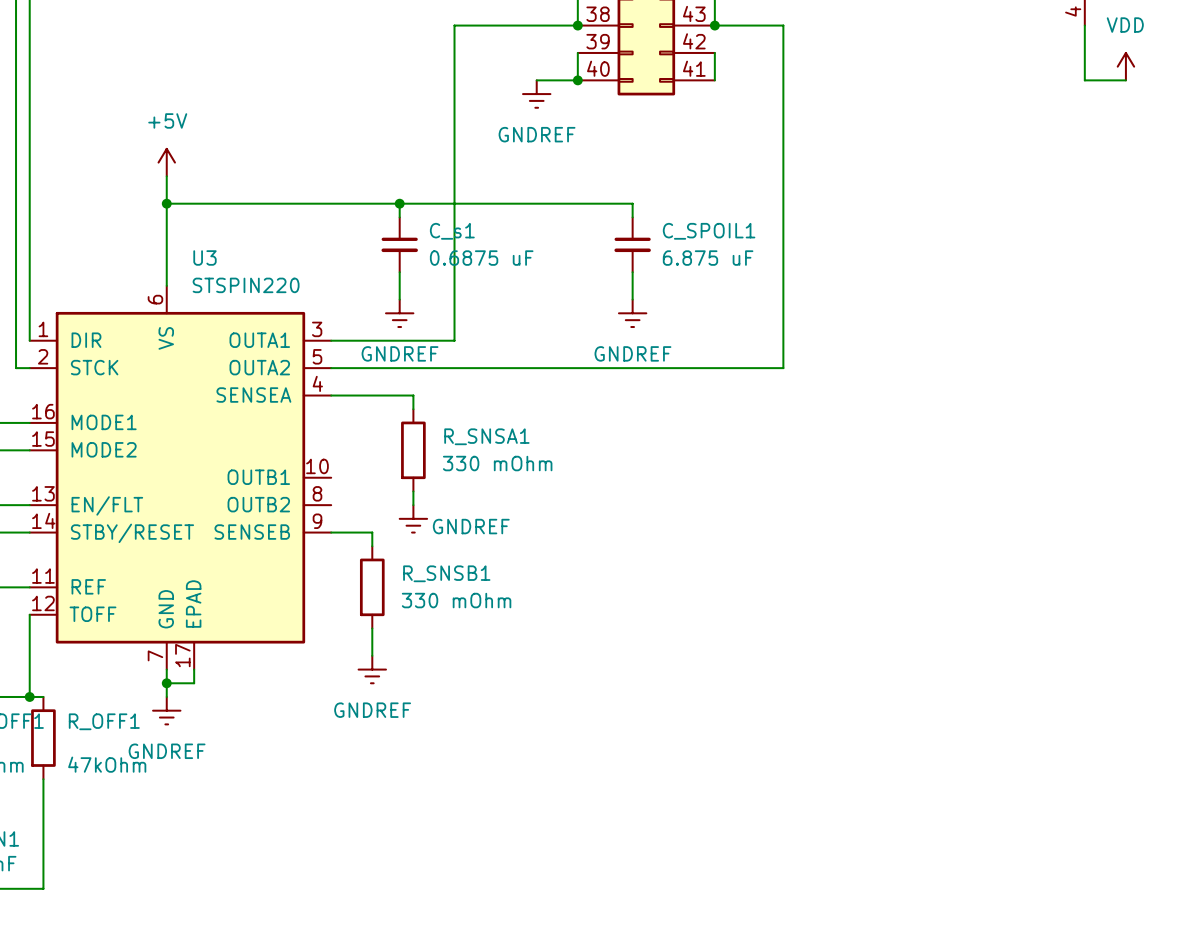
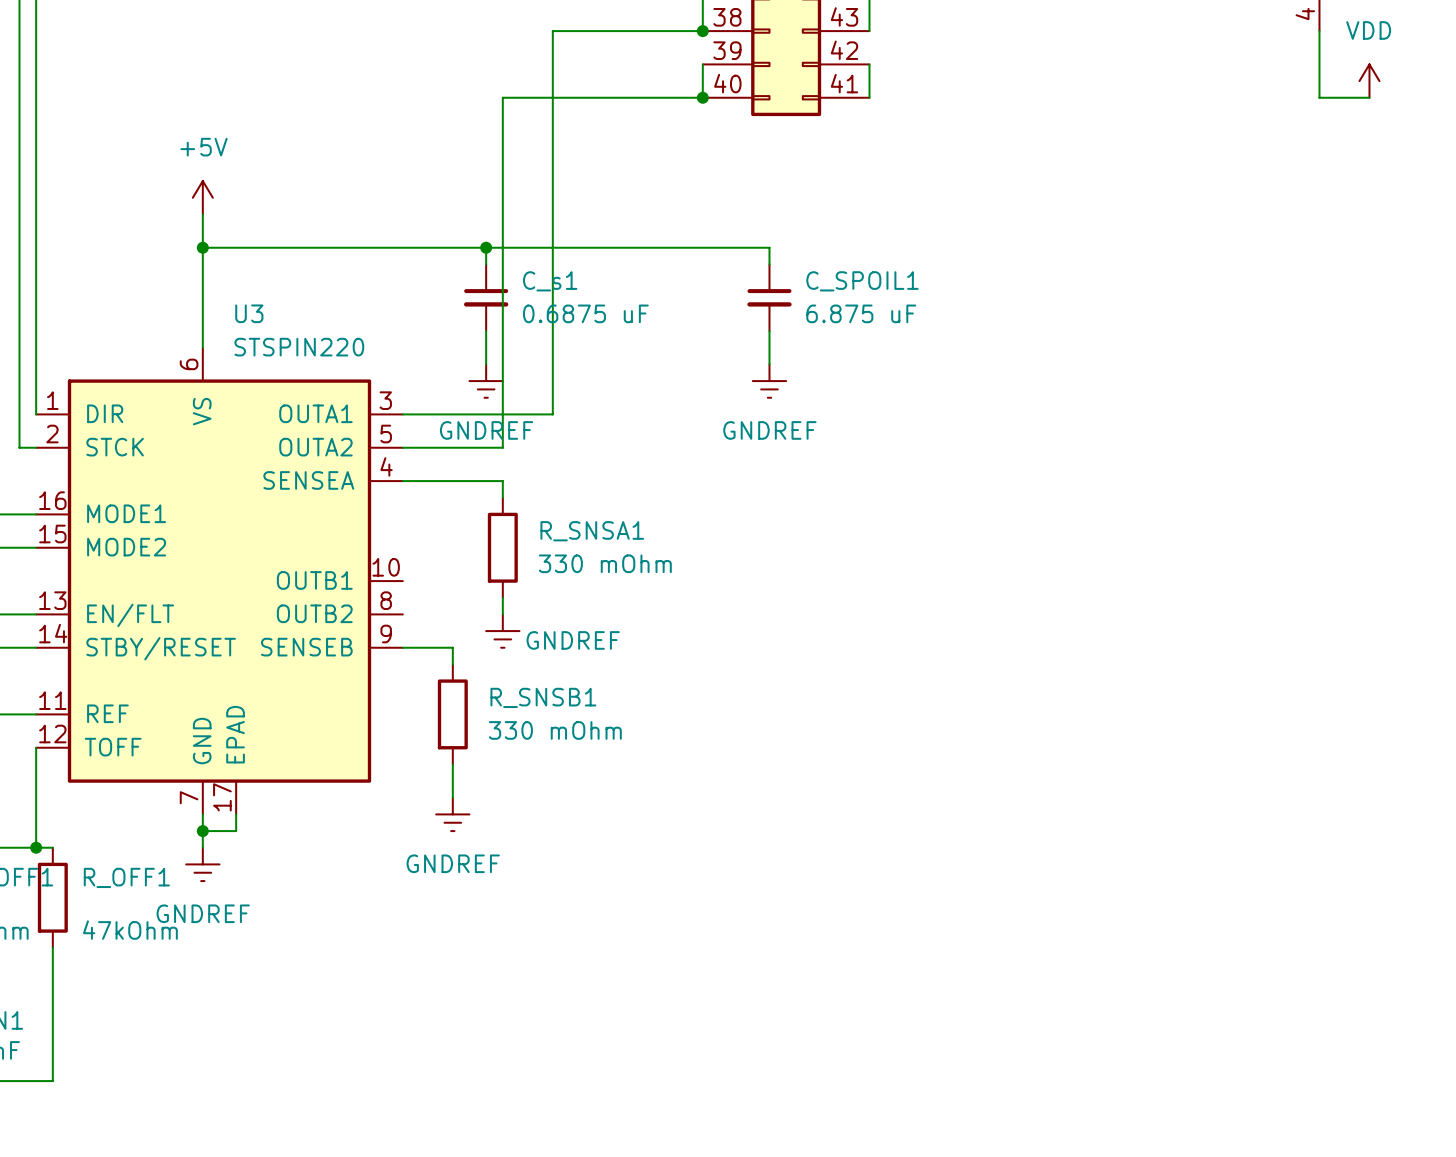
wire: (714, 25) (783, 25) (783, 368) (413, 368) -> (652, 97) (502, 97) (502, 447)
junction: (714, 25) -> none
power symbol: GNDREF (536, 94) -> none

